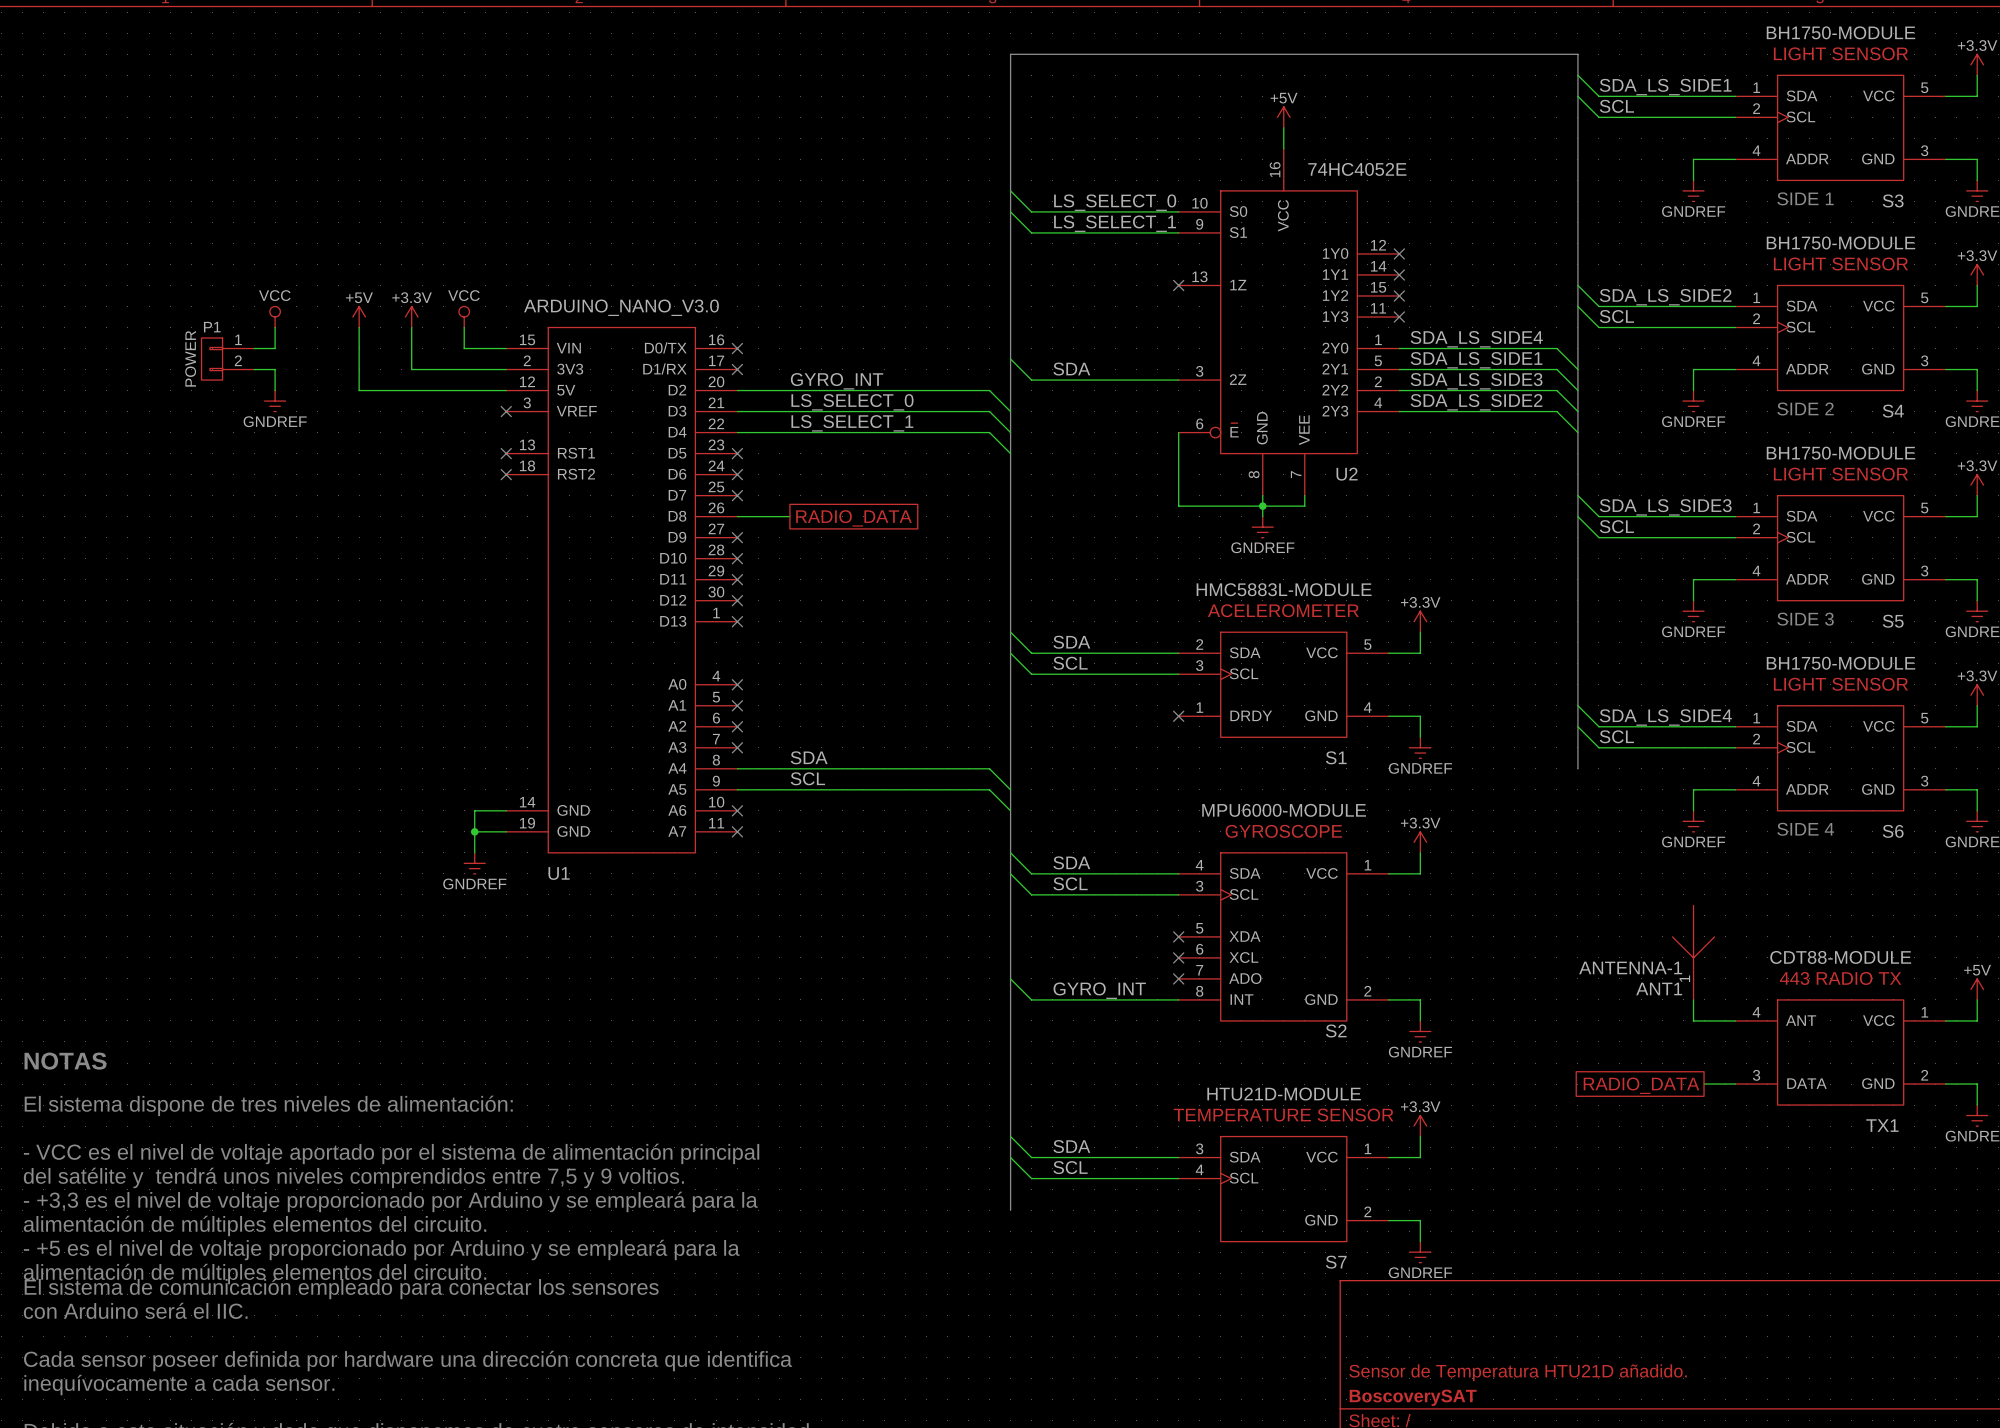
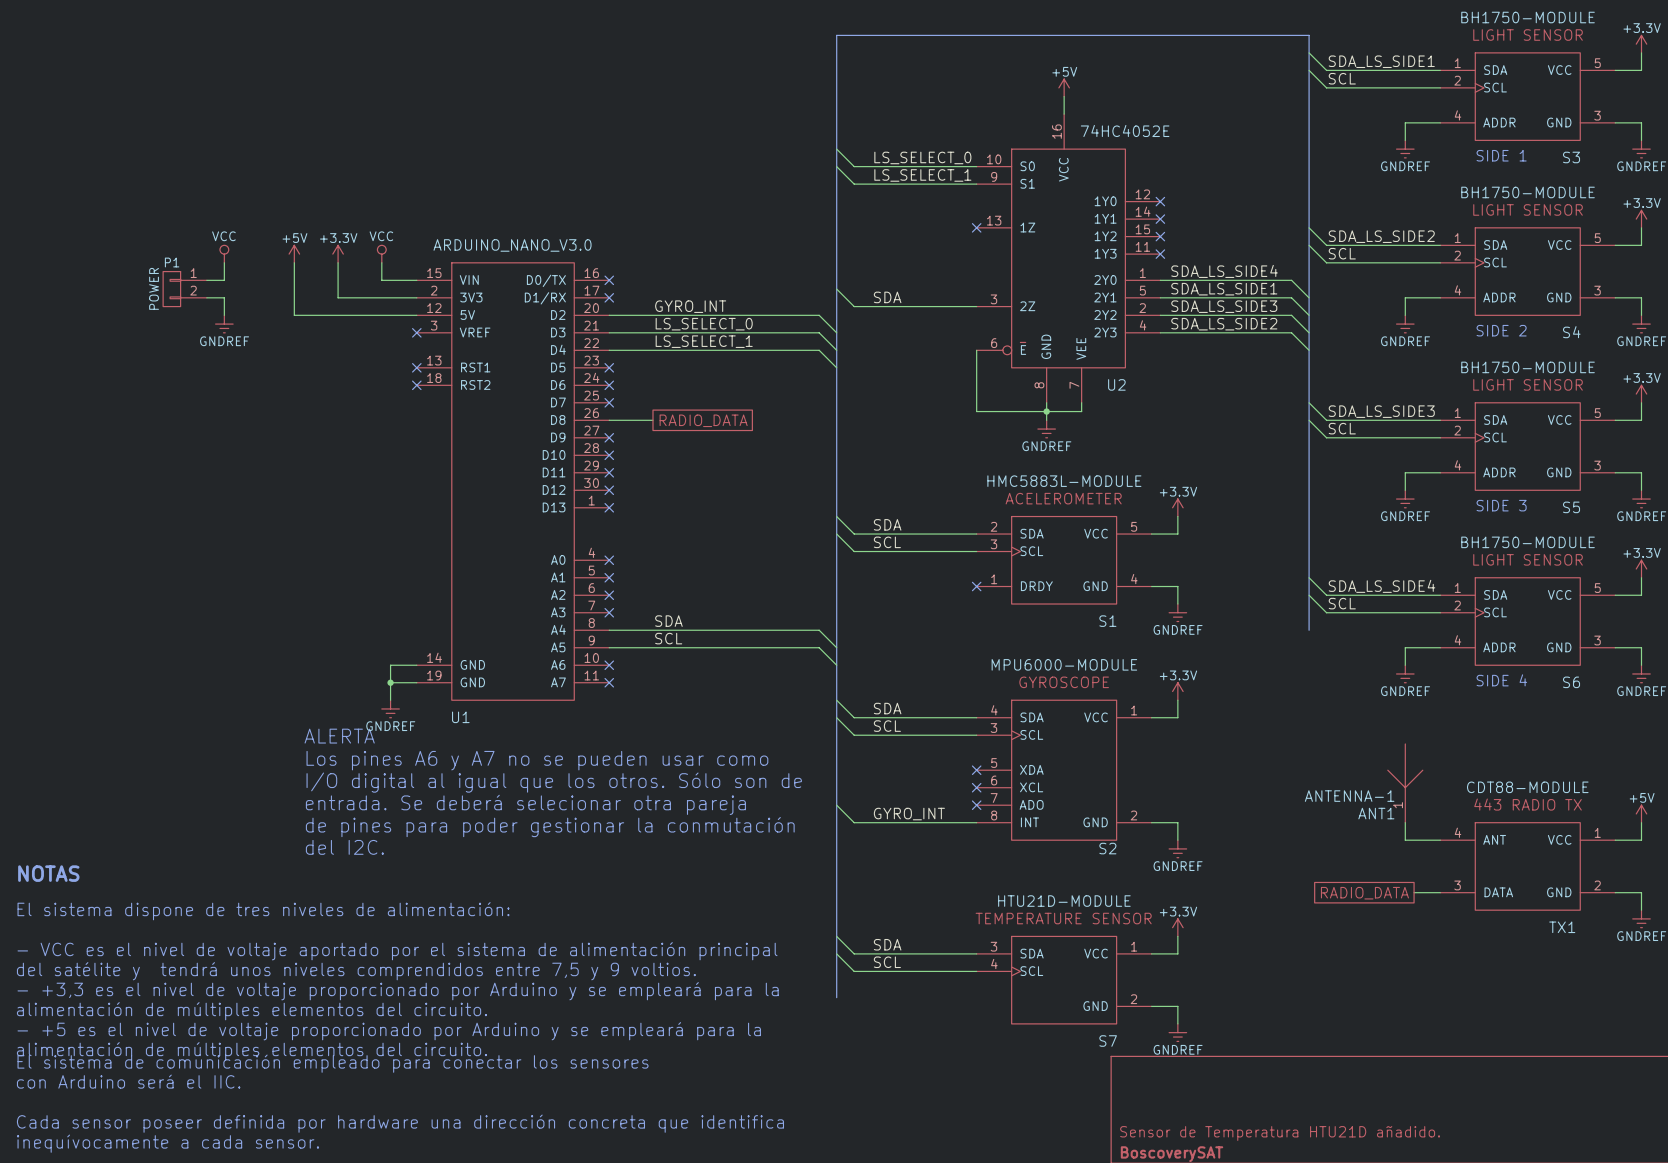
text: none -> ALERTA (339, 736)
text: none -> Los pines A6 y A7 no se pueden usar como (537, 760)
text: none -> I/O digital al igual que los otros. Sólo son de (554, 782)
text: none -> entrada. Se deberá selecionar otra pareja (525, 804)
text: none -> de pines para poder gestionar la conmutación (550, 827)
text: none -> del I2C. (344, 847)

